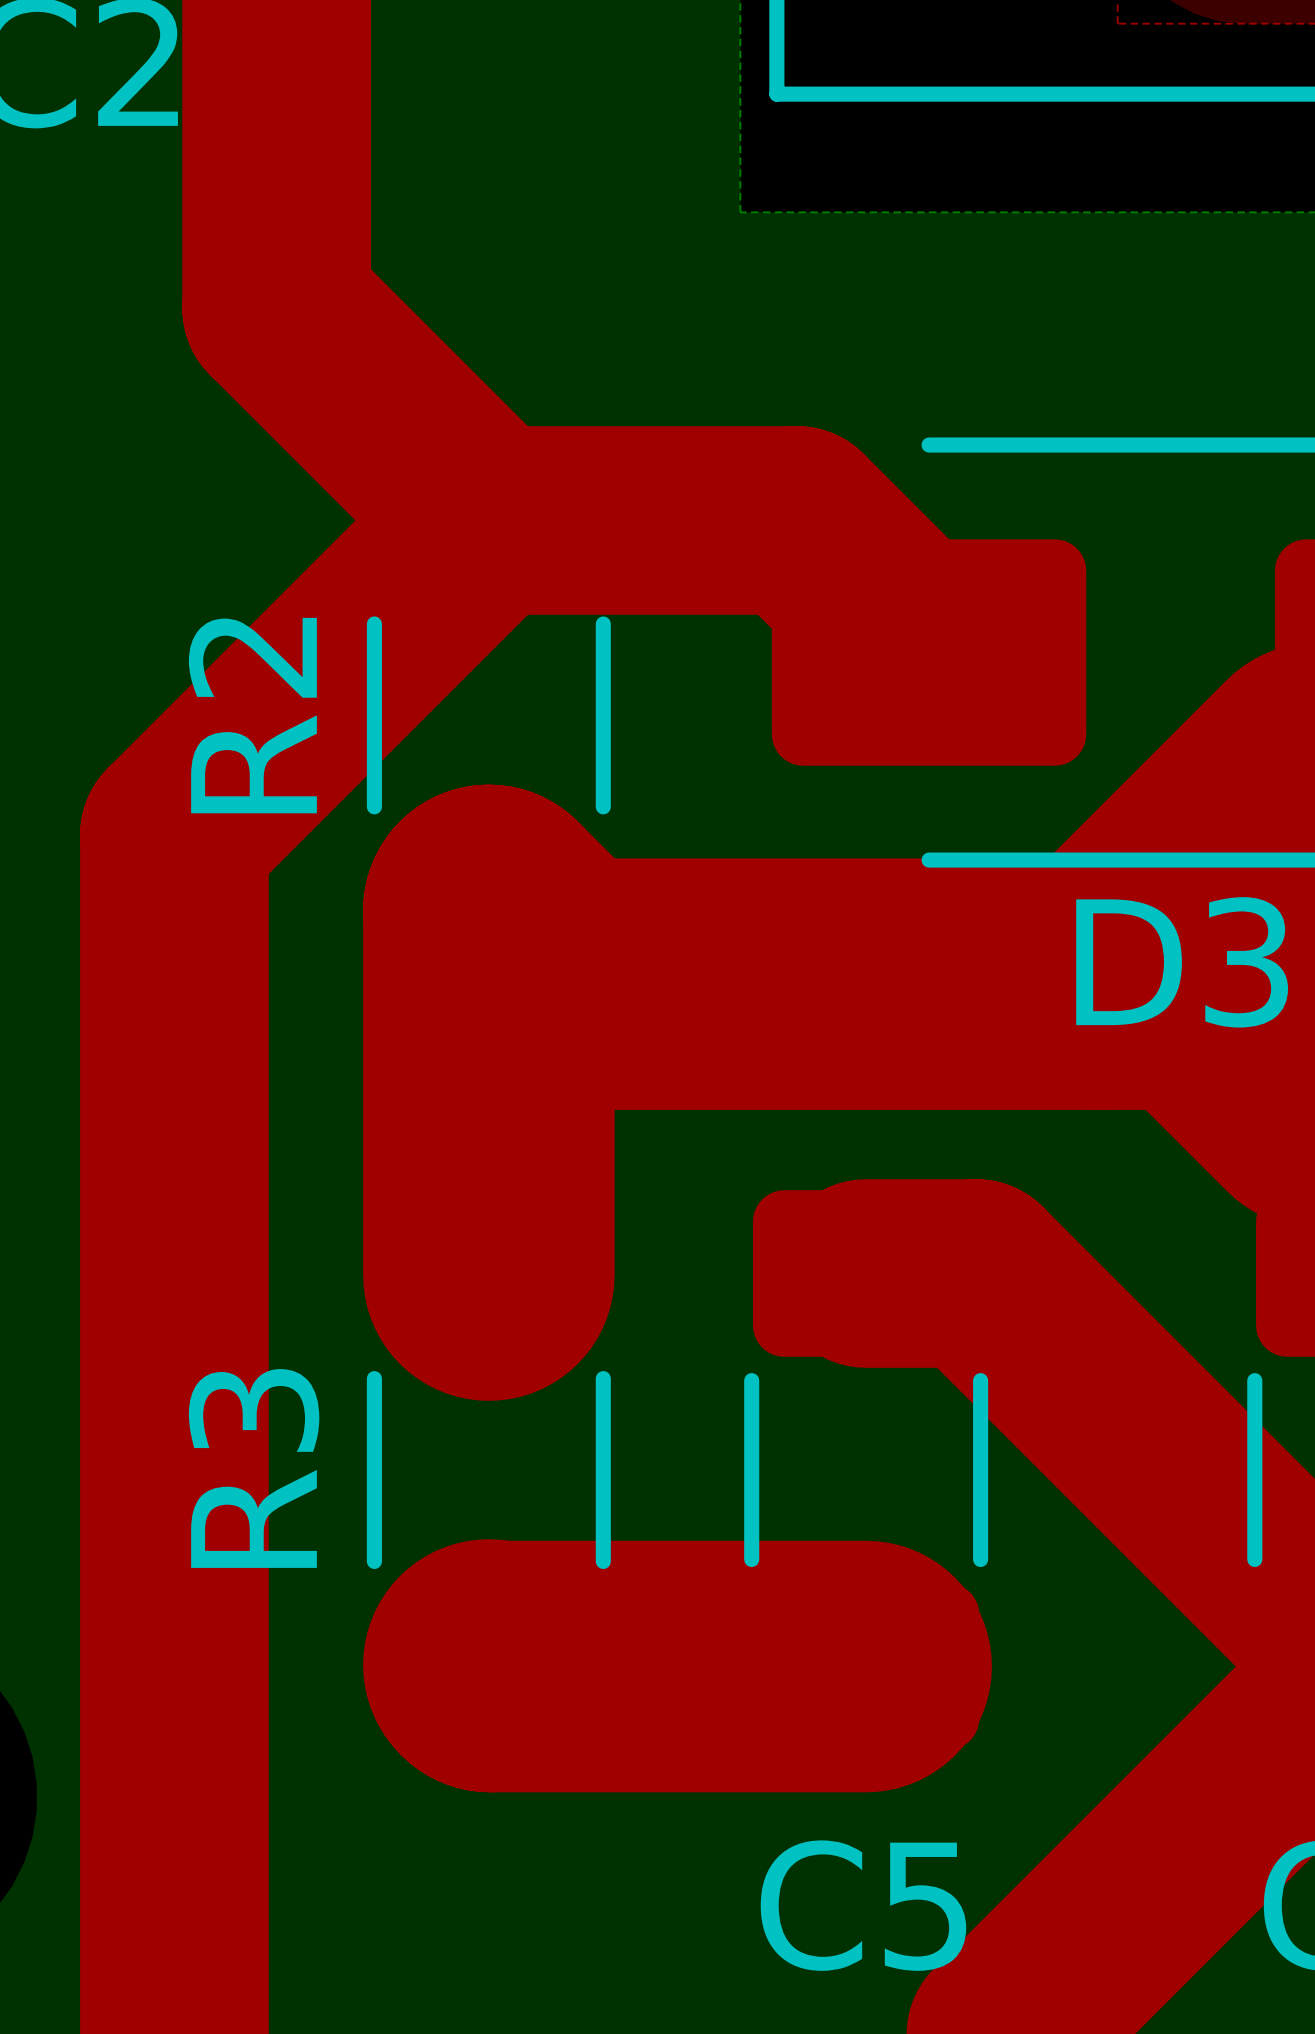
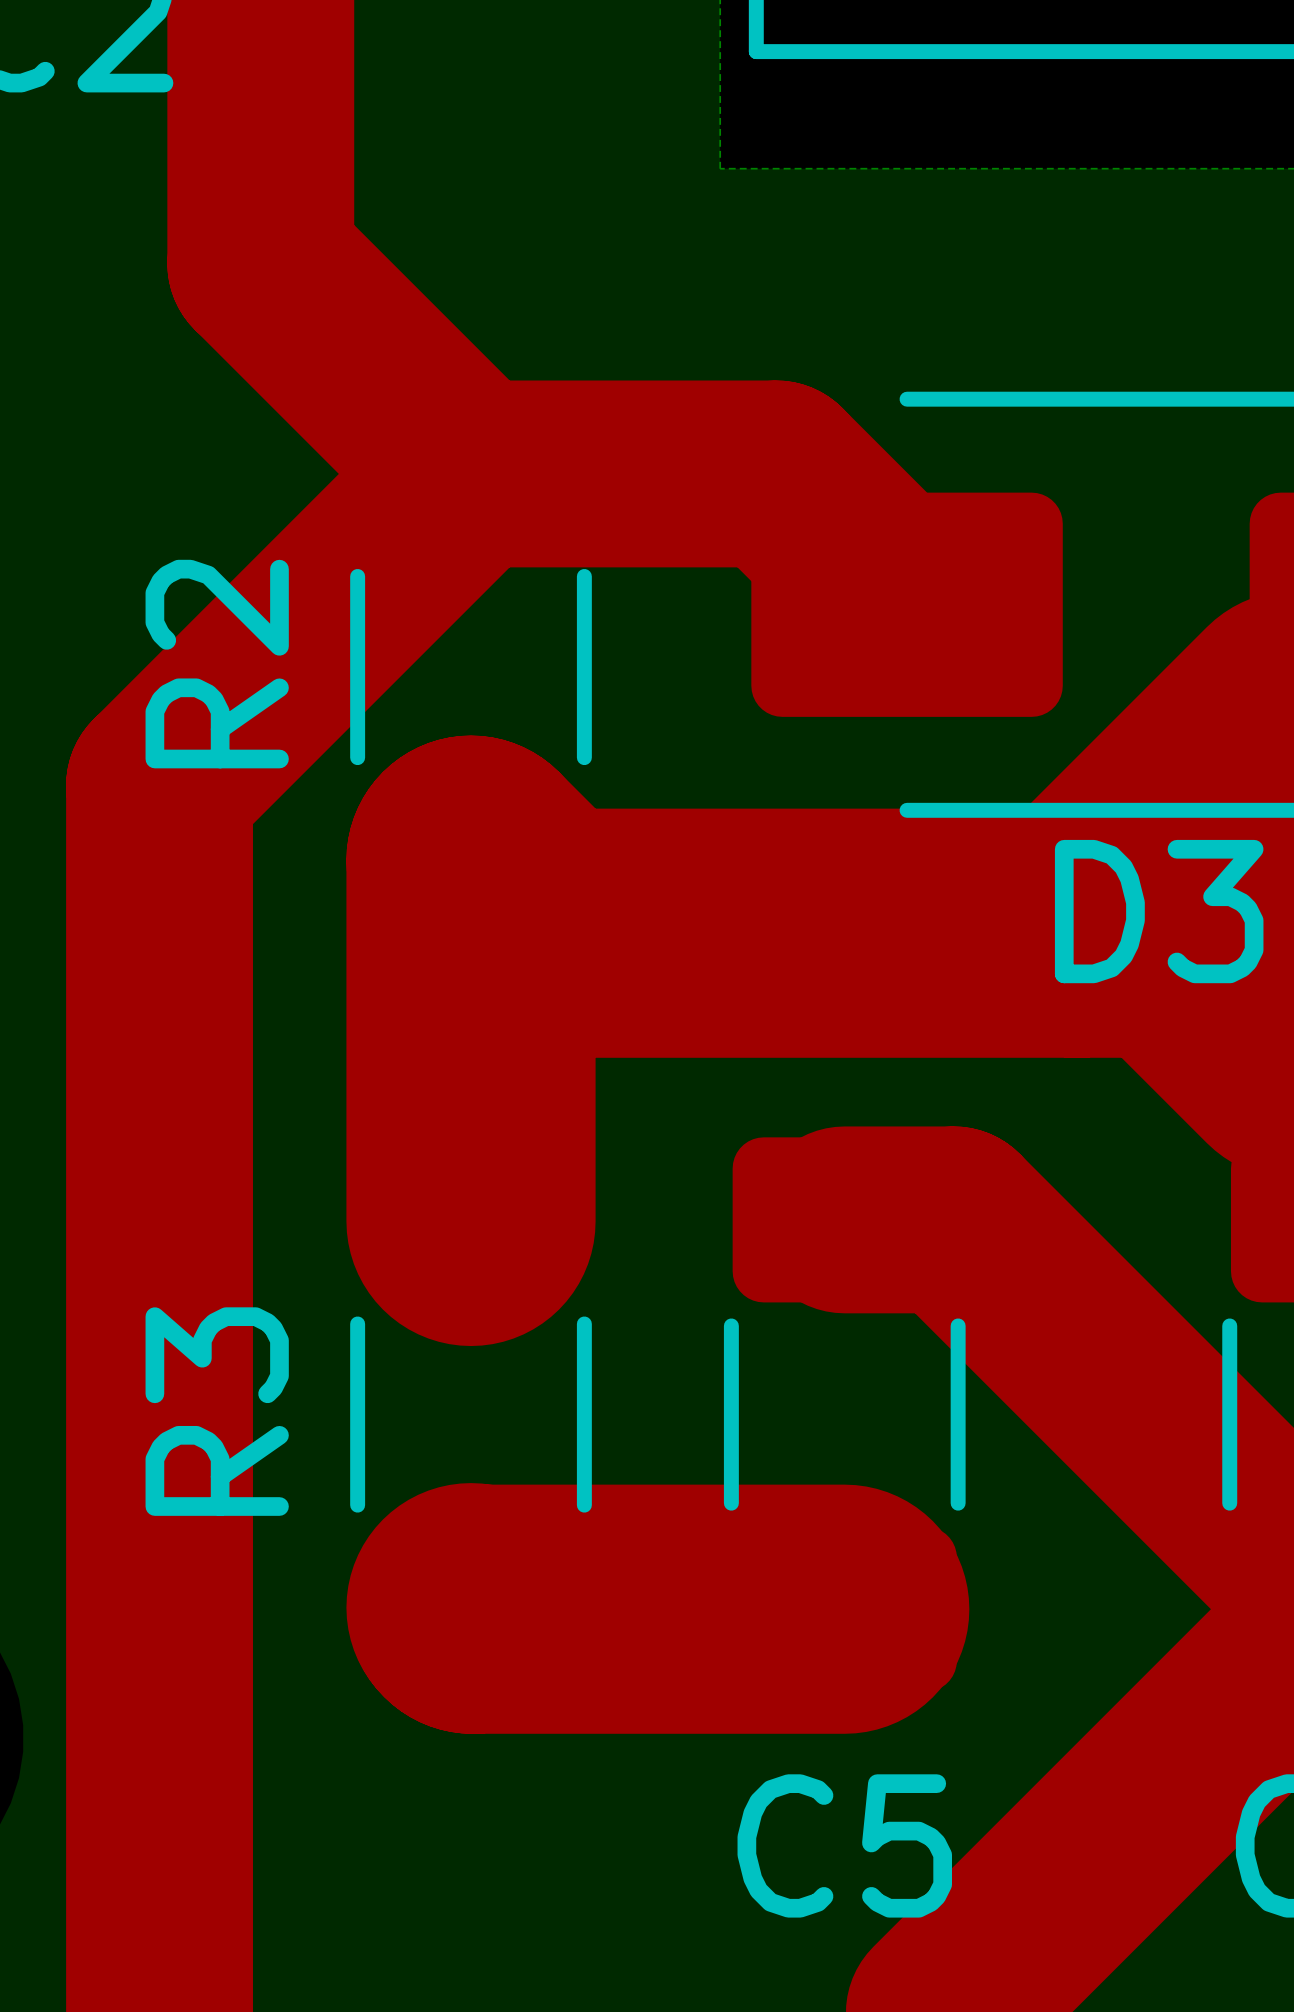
R2 name position: R2 (252, 715) -> R2 (217, 664)
R3 name position: R3 (254, 1468) -> R3 (217, 1411)

